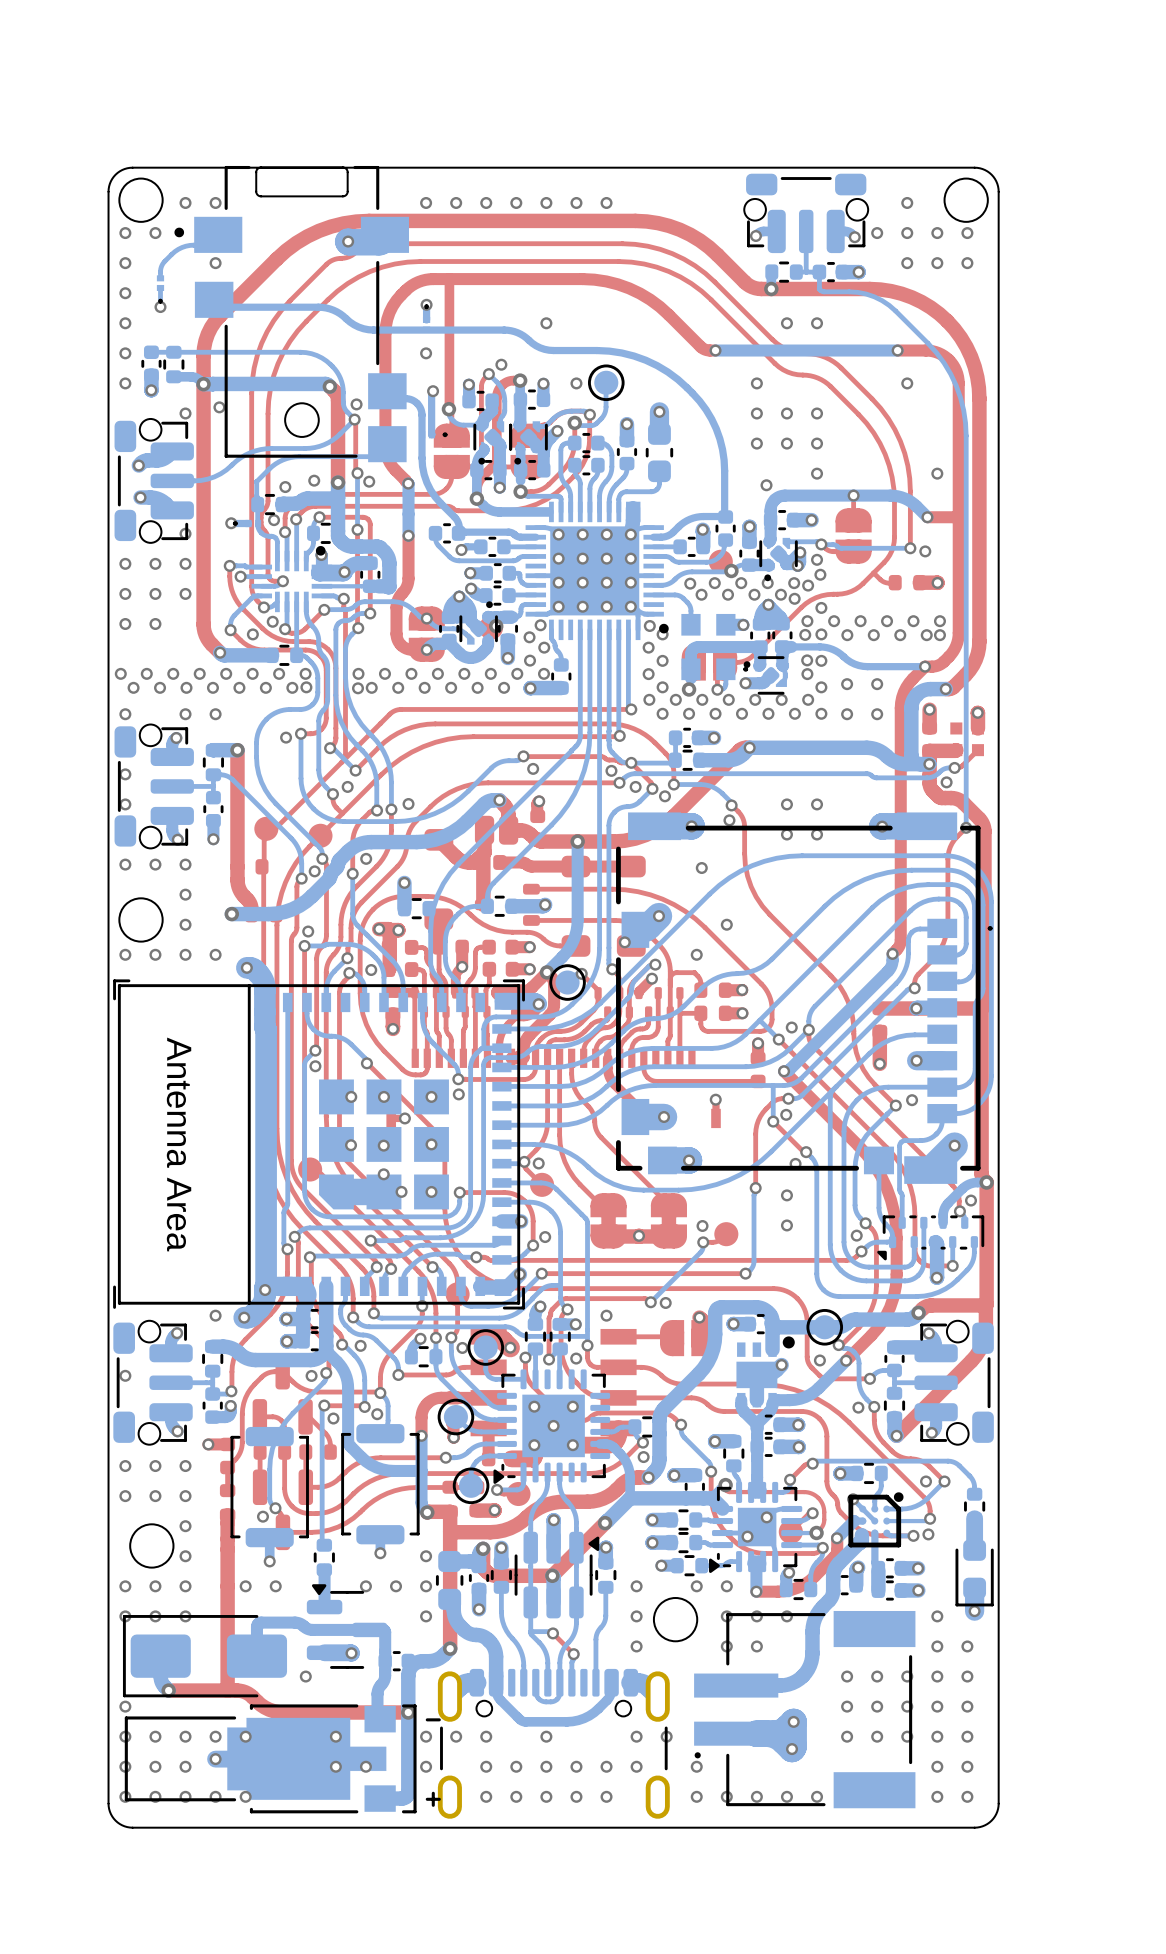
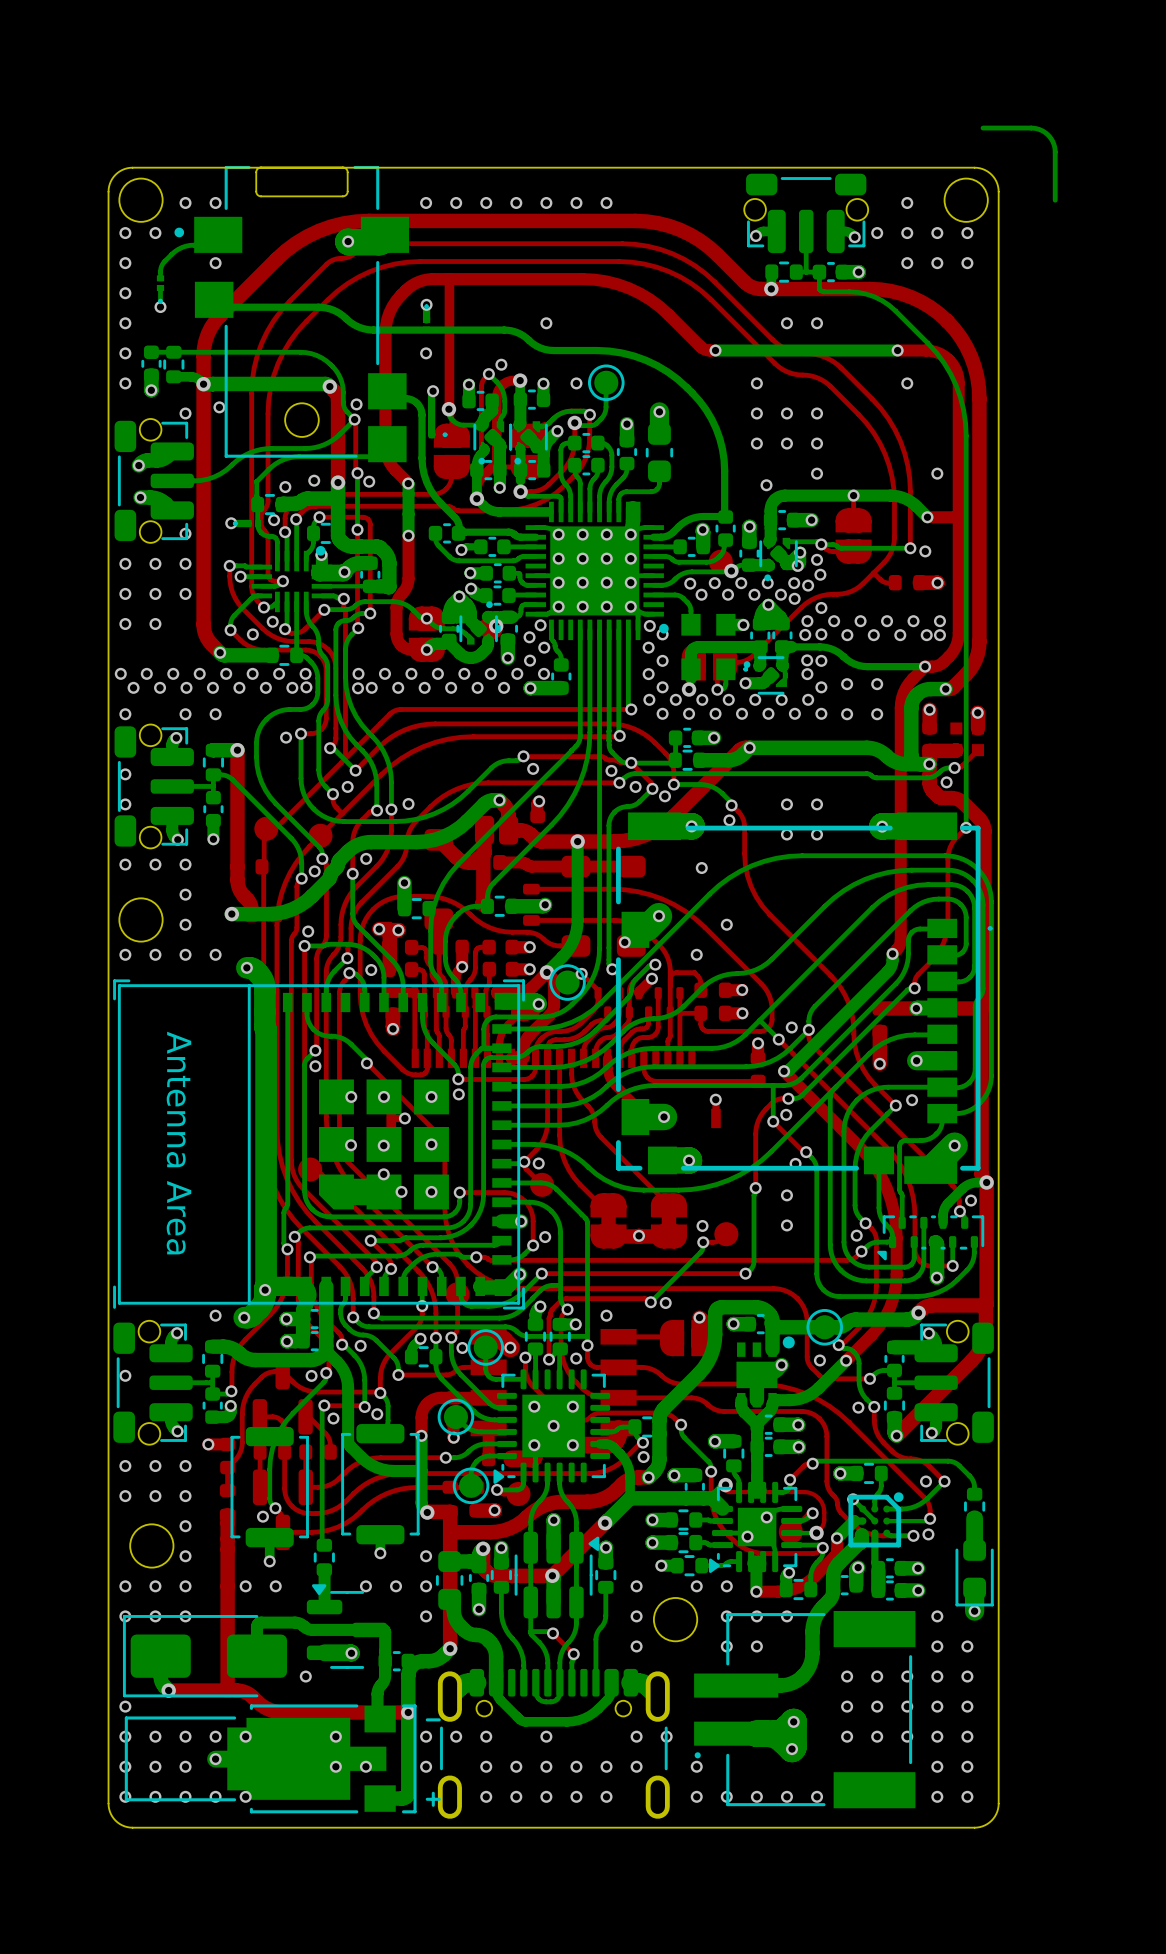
bottom track: none -> (983, 128) (1033, 128) (1048, 135) (1055, 149) (1055, 200)

